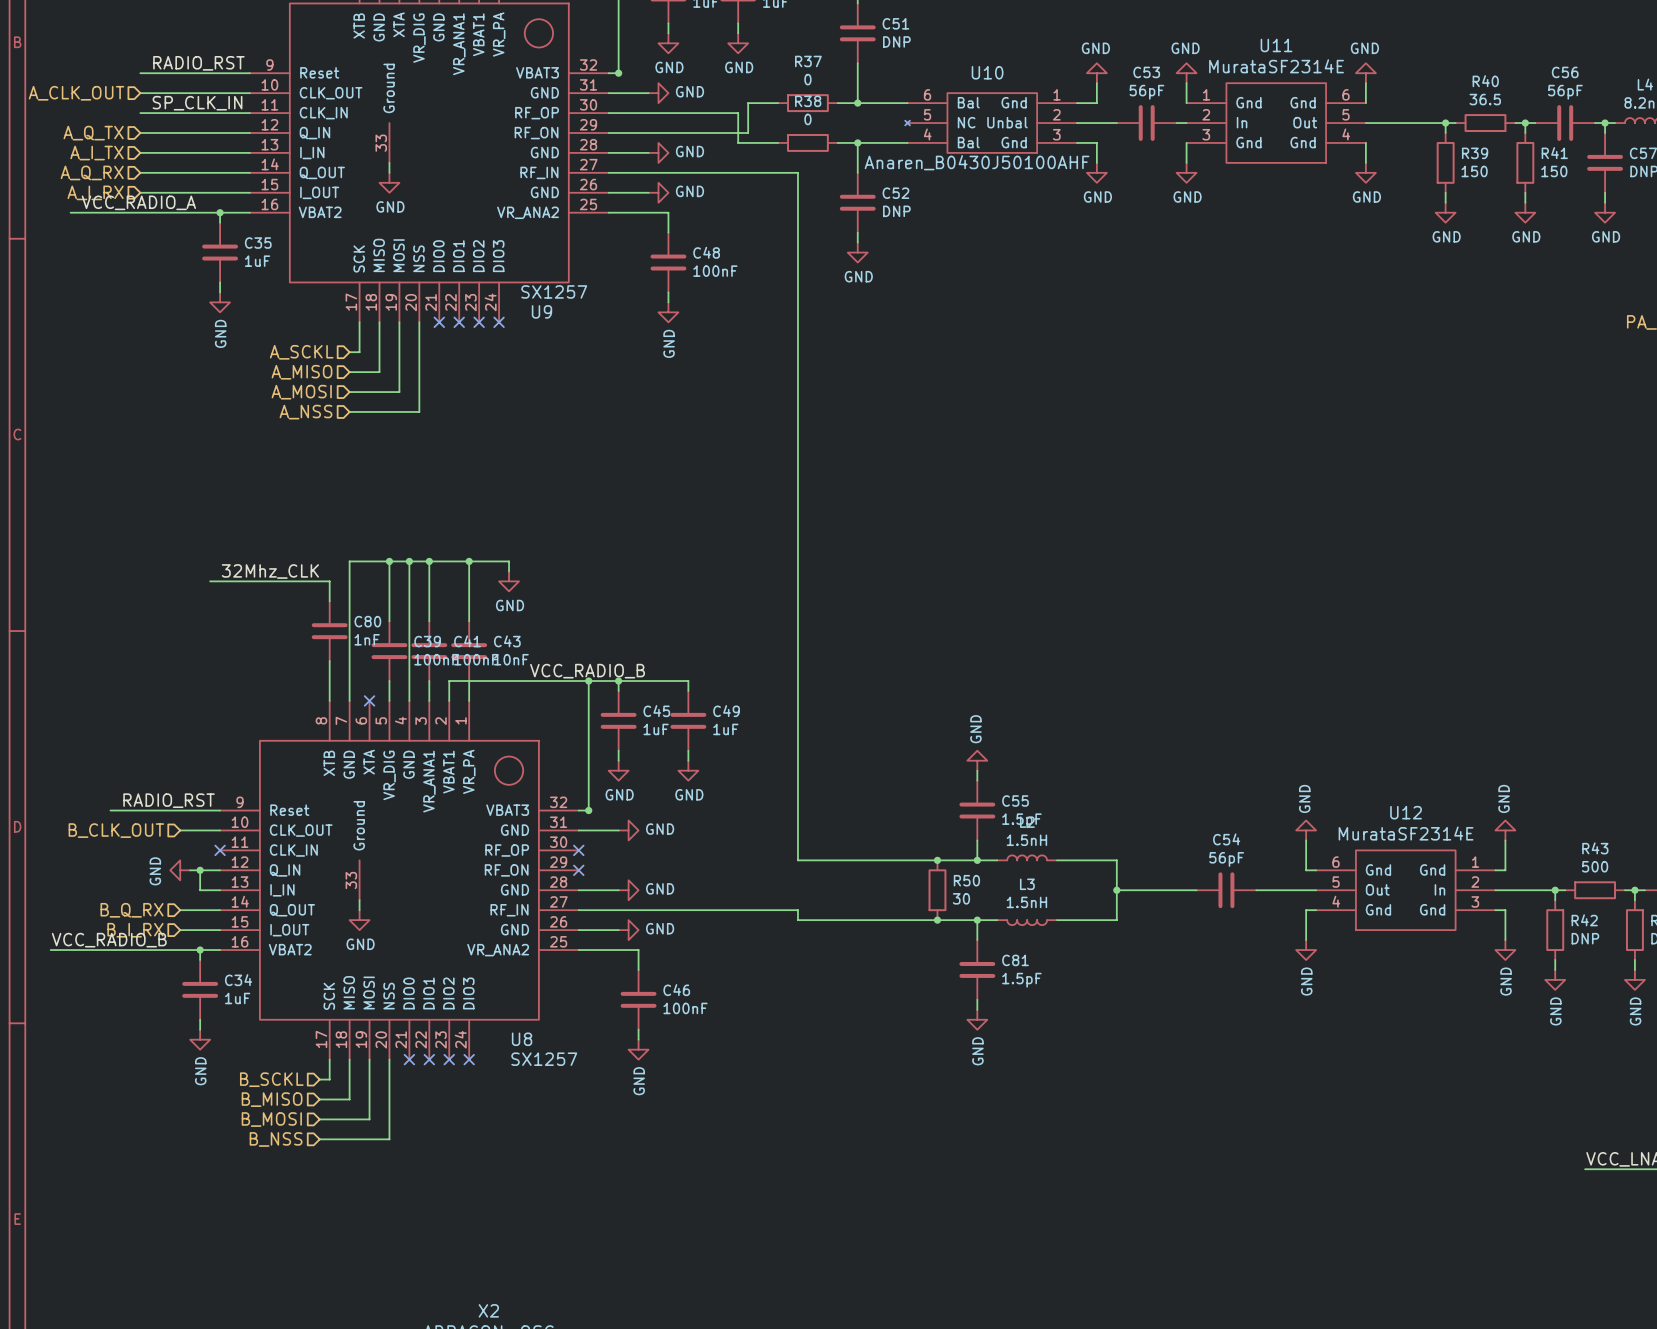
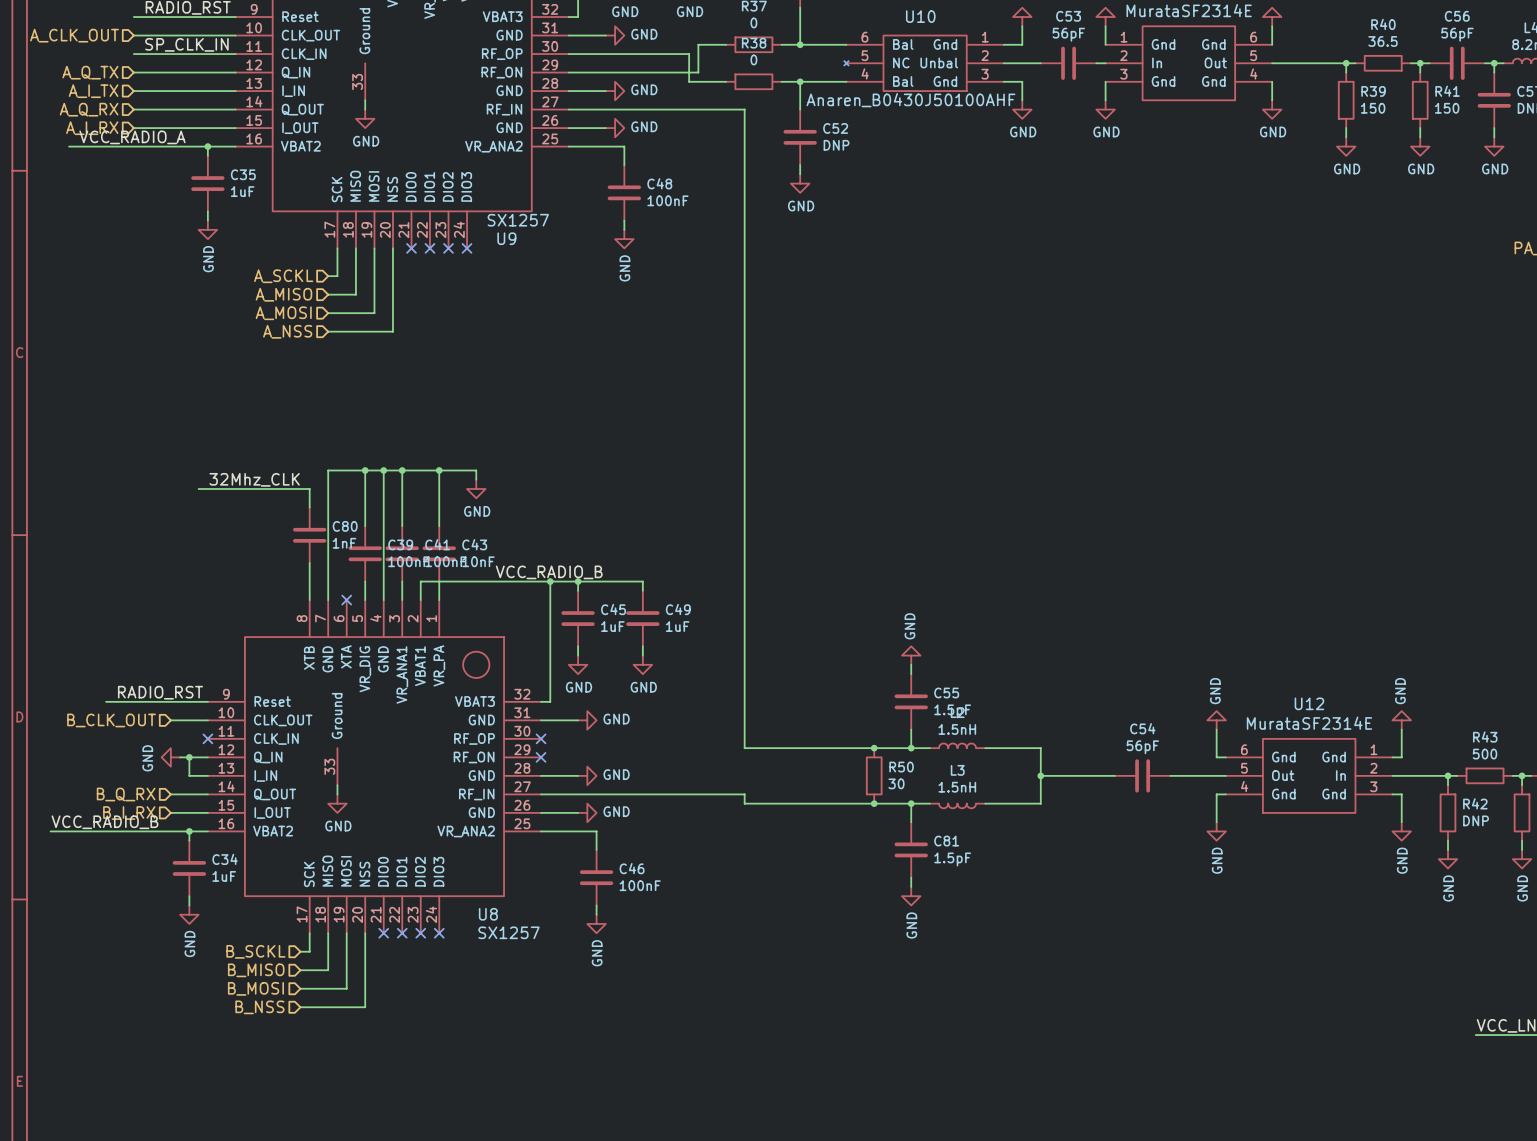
junction: (618, 73) -> none
junction: (588, 810) -> none

